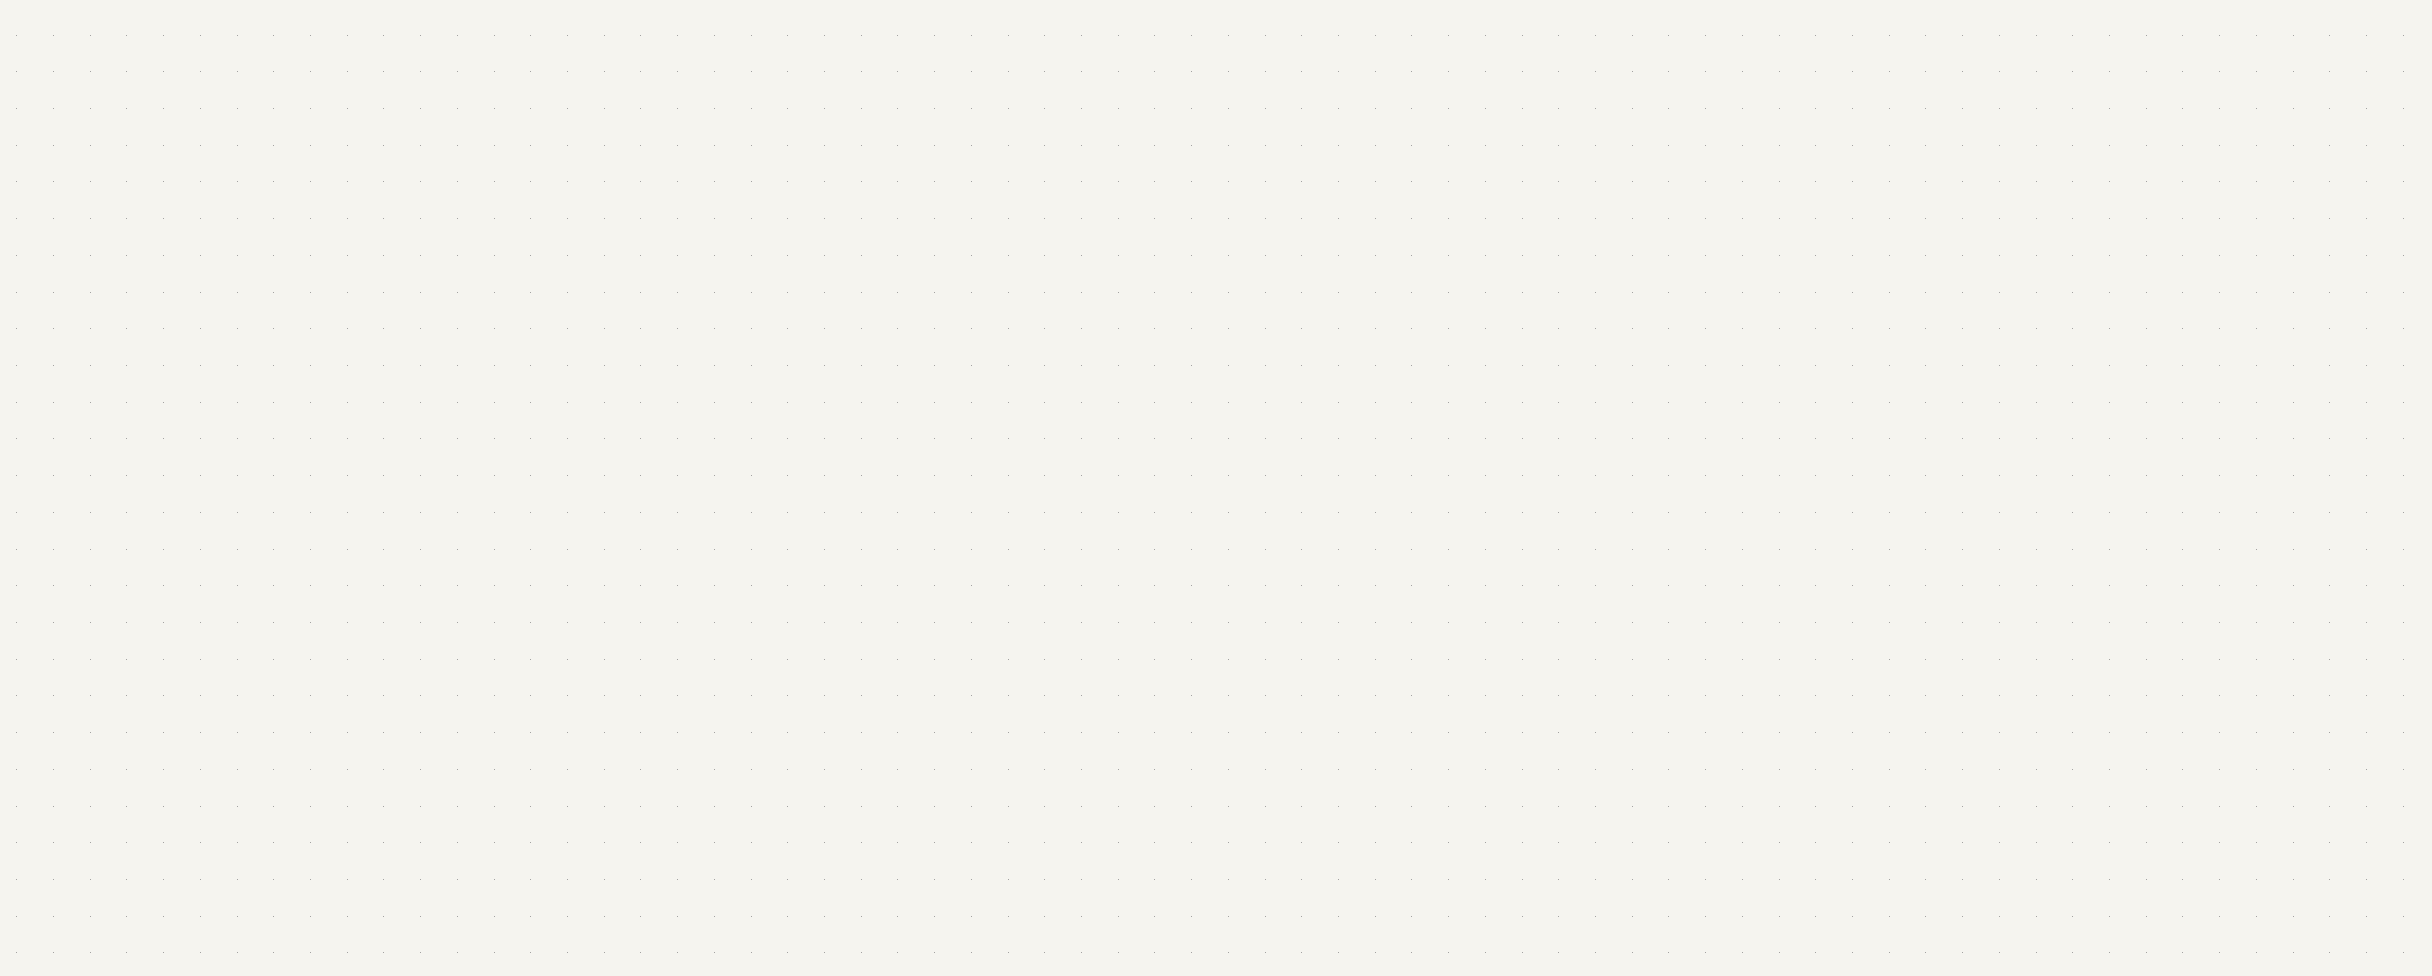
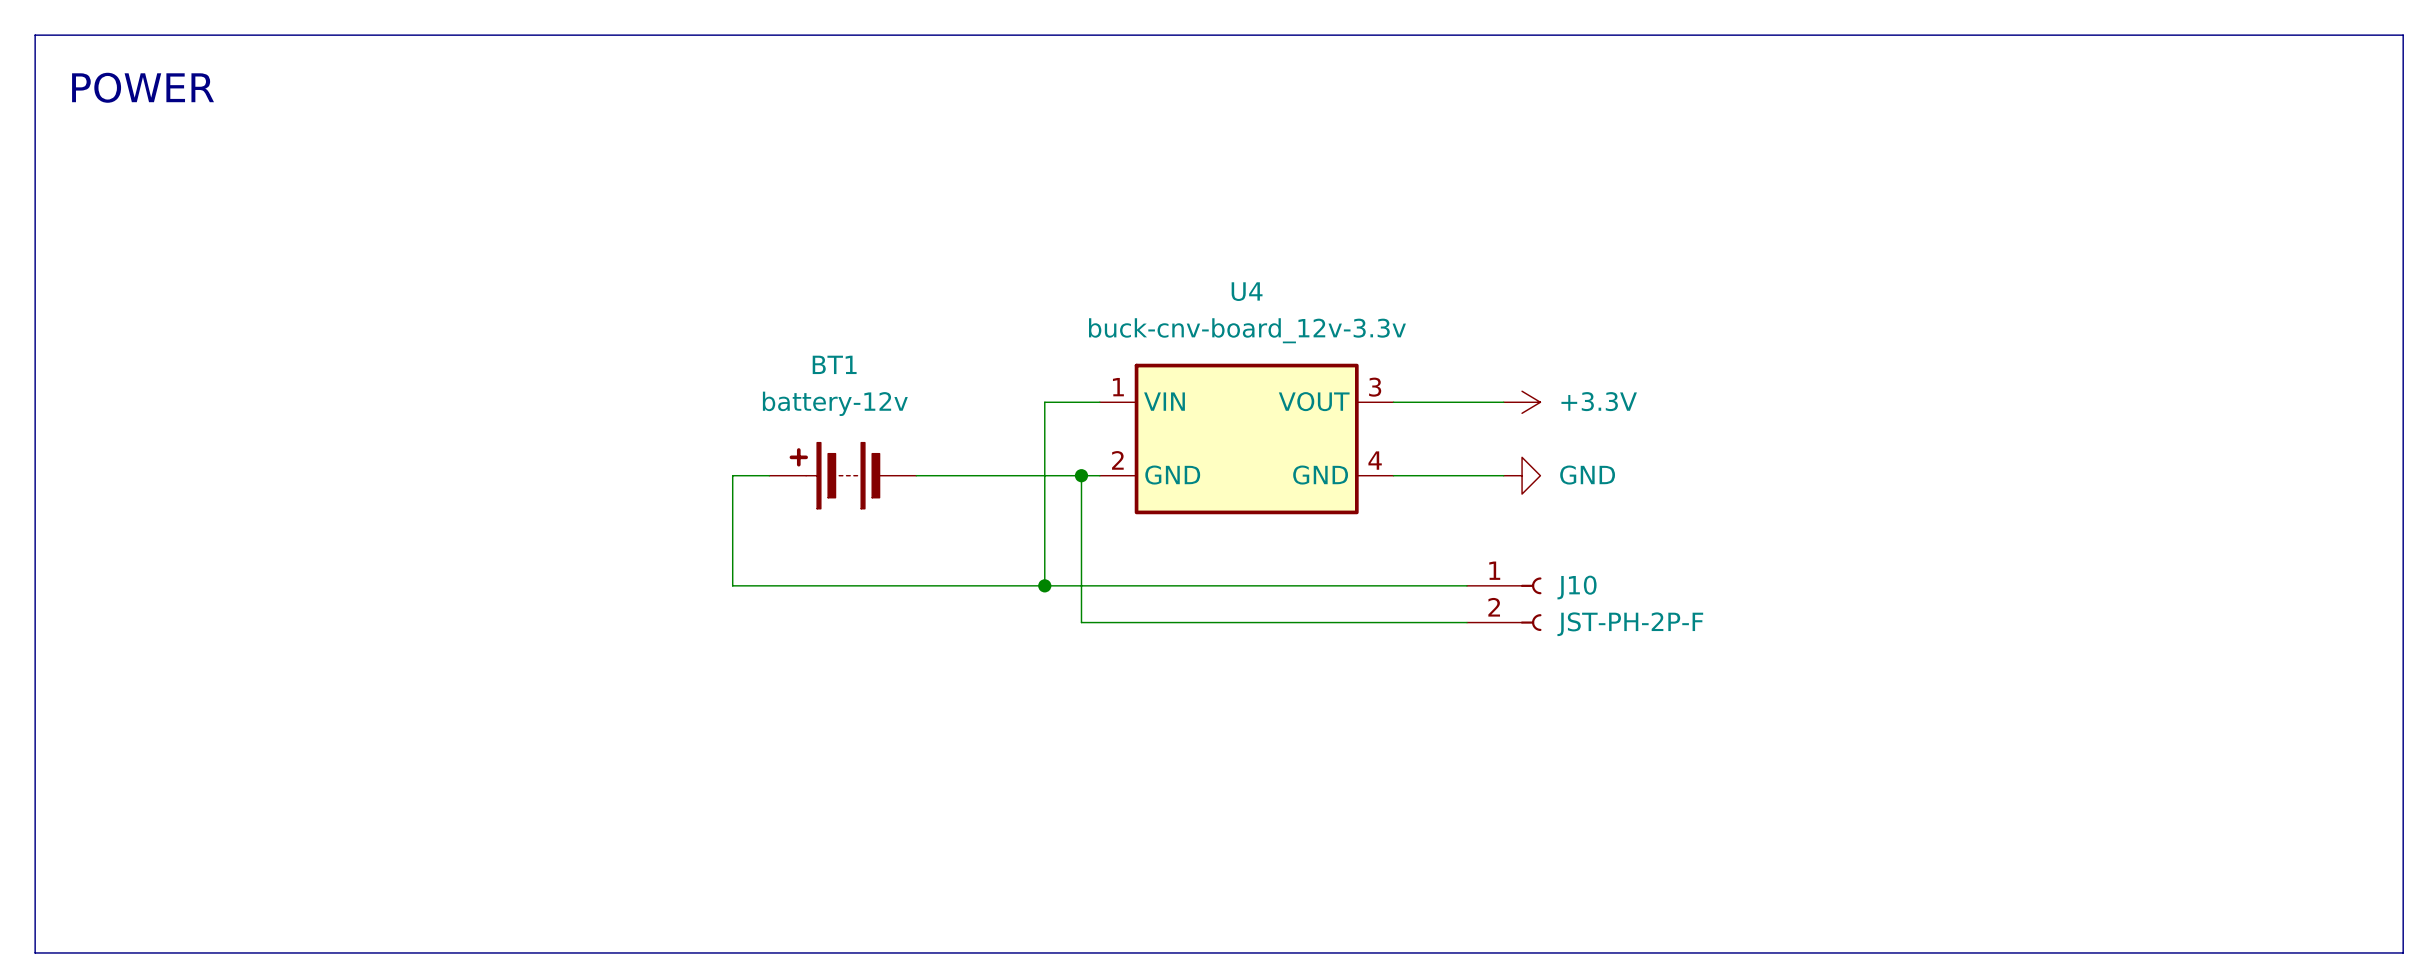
line: none -> (35, 35) (35, 952) (2403, 952) (2403, 35) (35, 35)
text: none -> POWER (143, 87)
wire: none -> (1099, 402) (1044, 402) (1044, 585)
wire: none -> (1393, 402) (1503, 402)
power symbol: none -> +3.3V (1522, 402)
U4: none -> buck-cnv-board_12v-3.3v (1246, 438)
wire: none -> (769, 475) (732, 475) (732, 585) (1466, 585)
BT1: none -> battery-12v (842, 475)
wire: none -> (916, 475) (1099, 475)
wire: none -> (1081, 475) (1081, 622) (1466, 622)
junction: none -> (1081, 475)
wire: none -> (1393, 475) (1503, 475)
power symbol: none -> GND (1522, 475)
junction: none -> (1044, 585)
J10: none -> JST-PH-2P-F (1504, 604)

